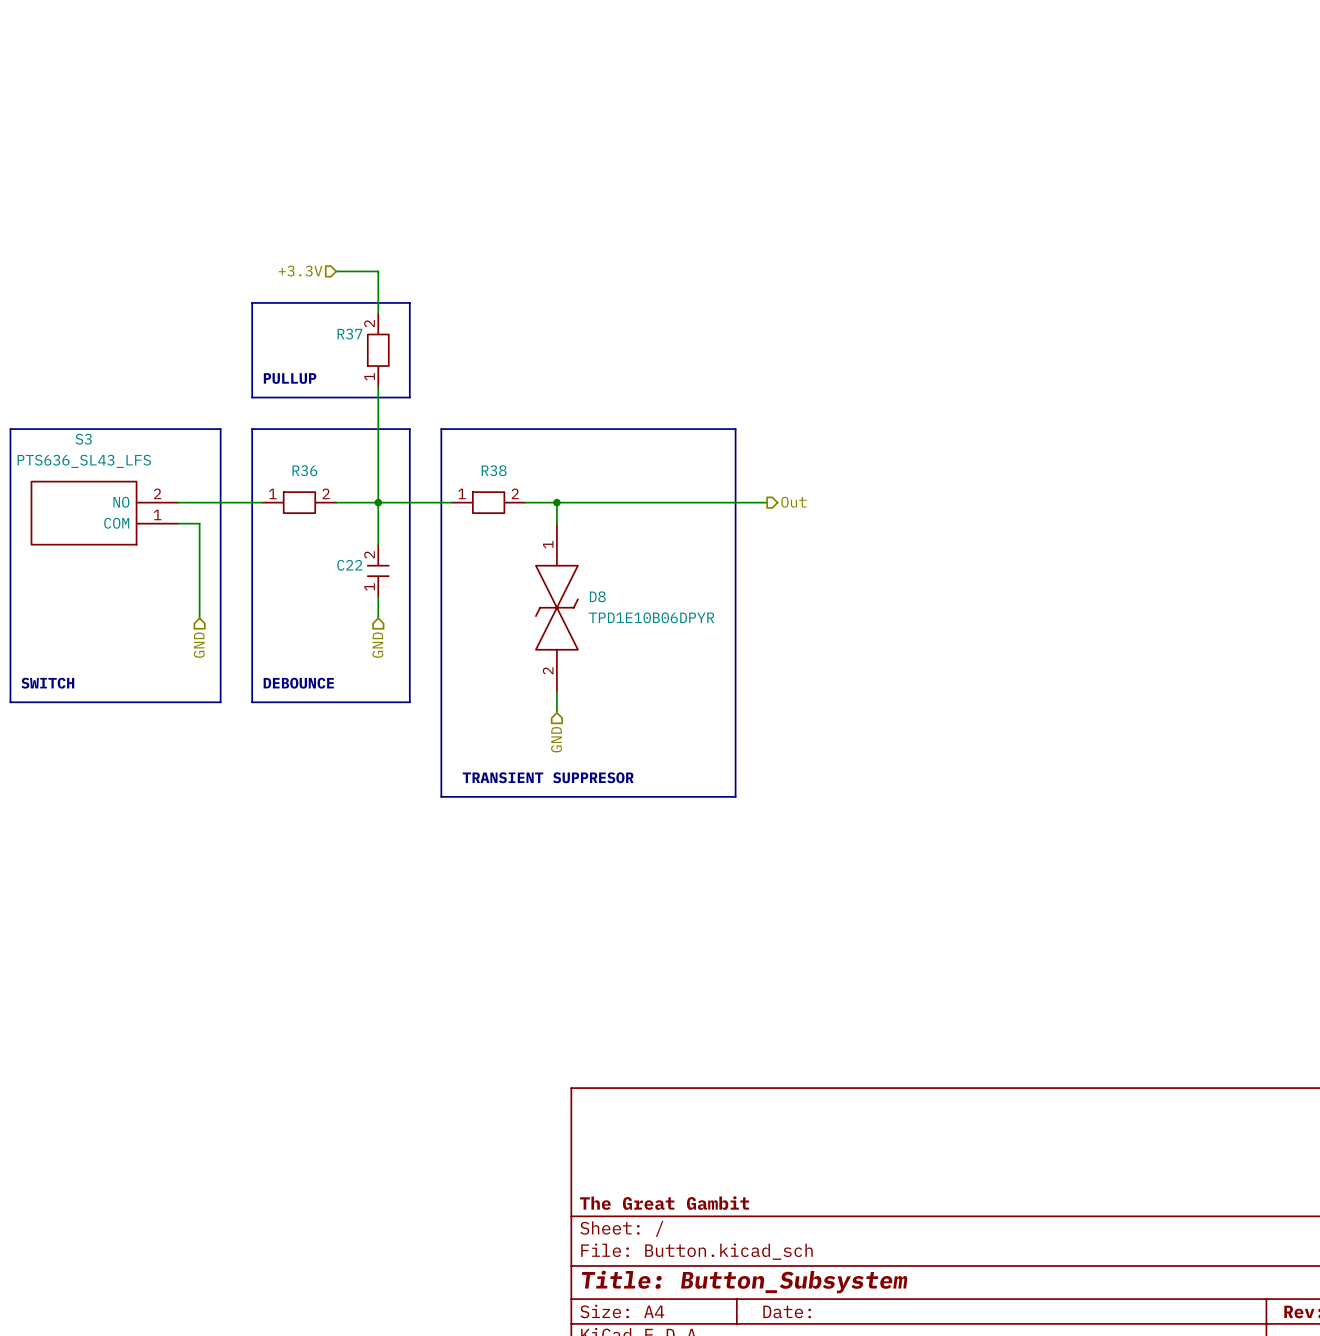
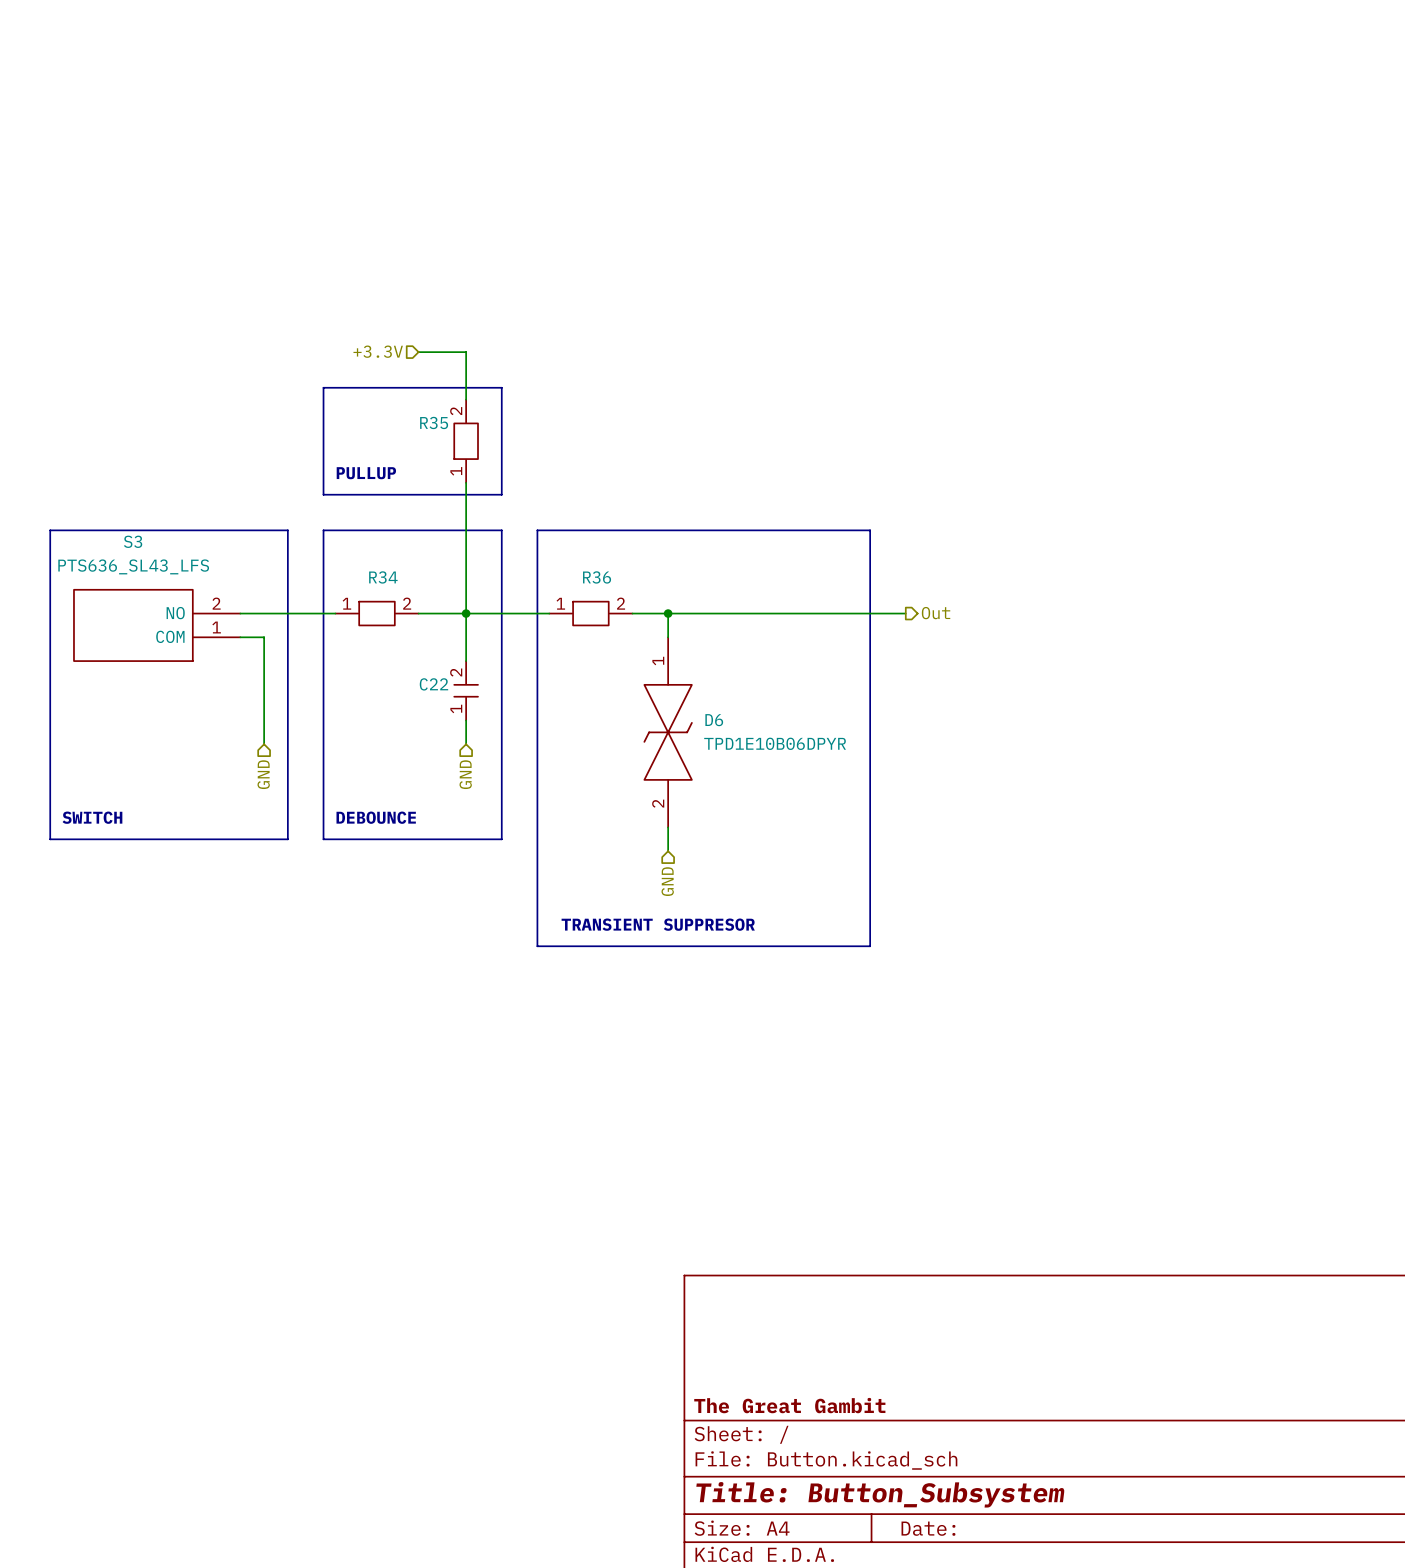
R37 name: R37 (349, 334) -> R35 (434, 422)
R36 name: R36 (304, 470) -> R34 (383, 577)
R38 name: R38 (494, 470) -> R36 (597, 577)
D8 name: D8 (597, 596) -> D6 (714, 720)

